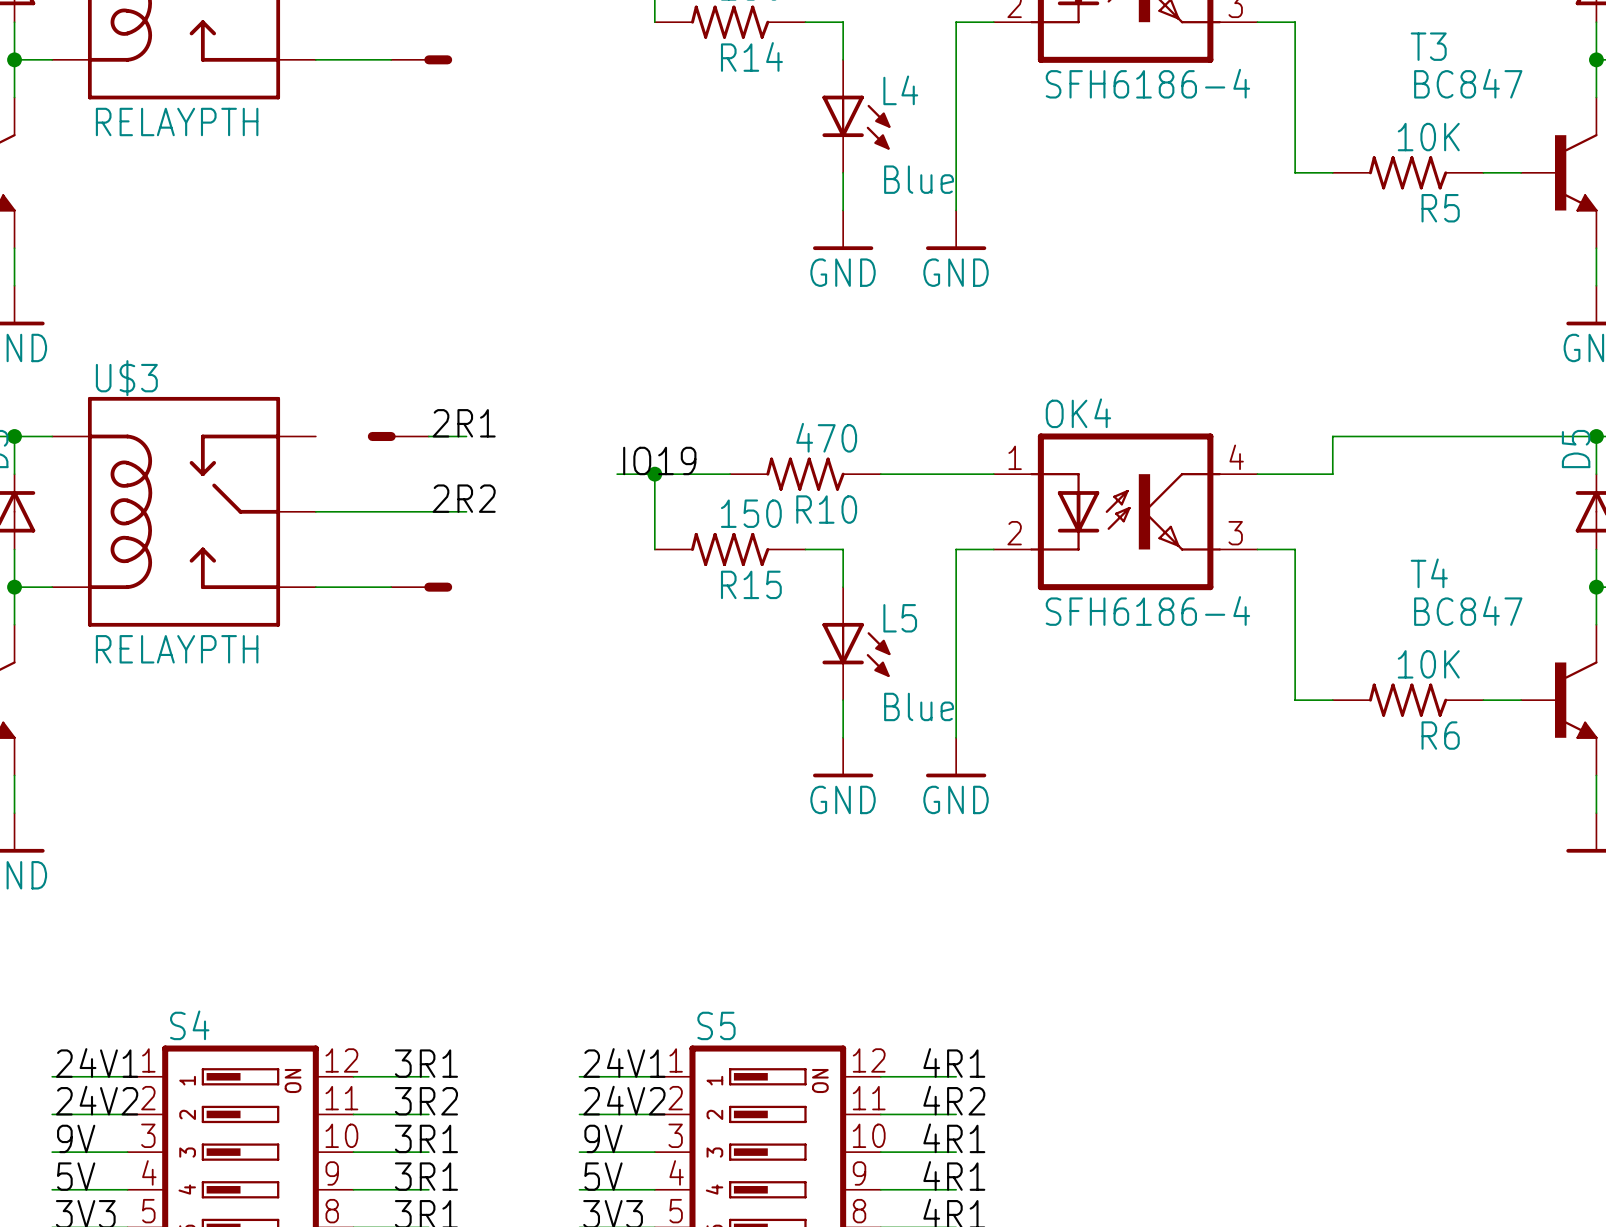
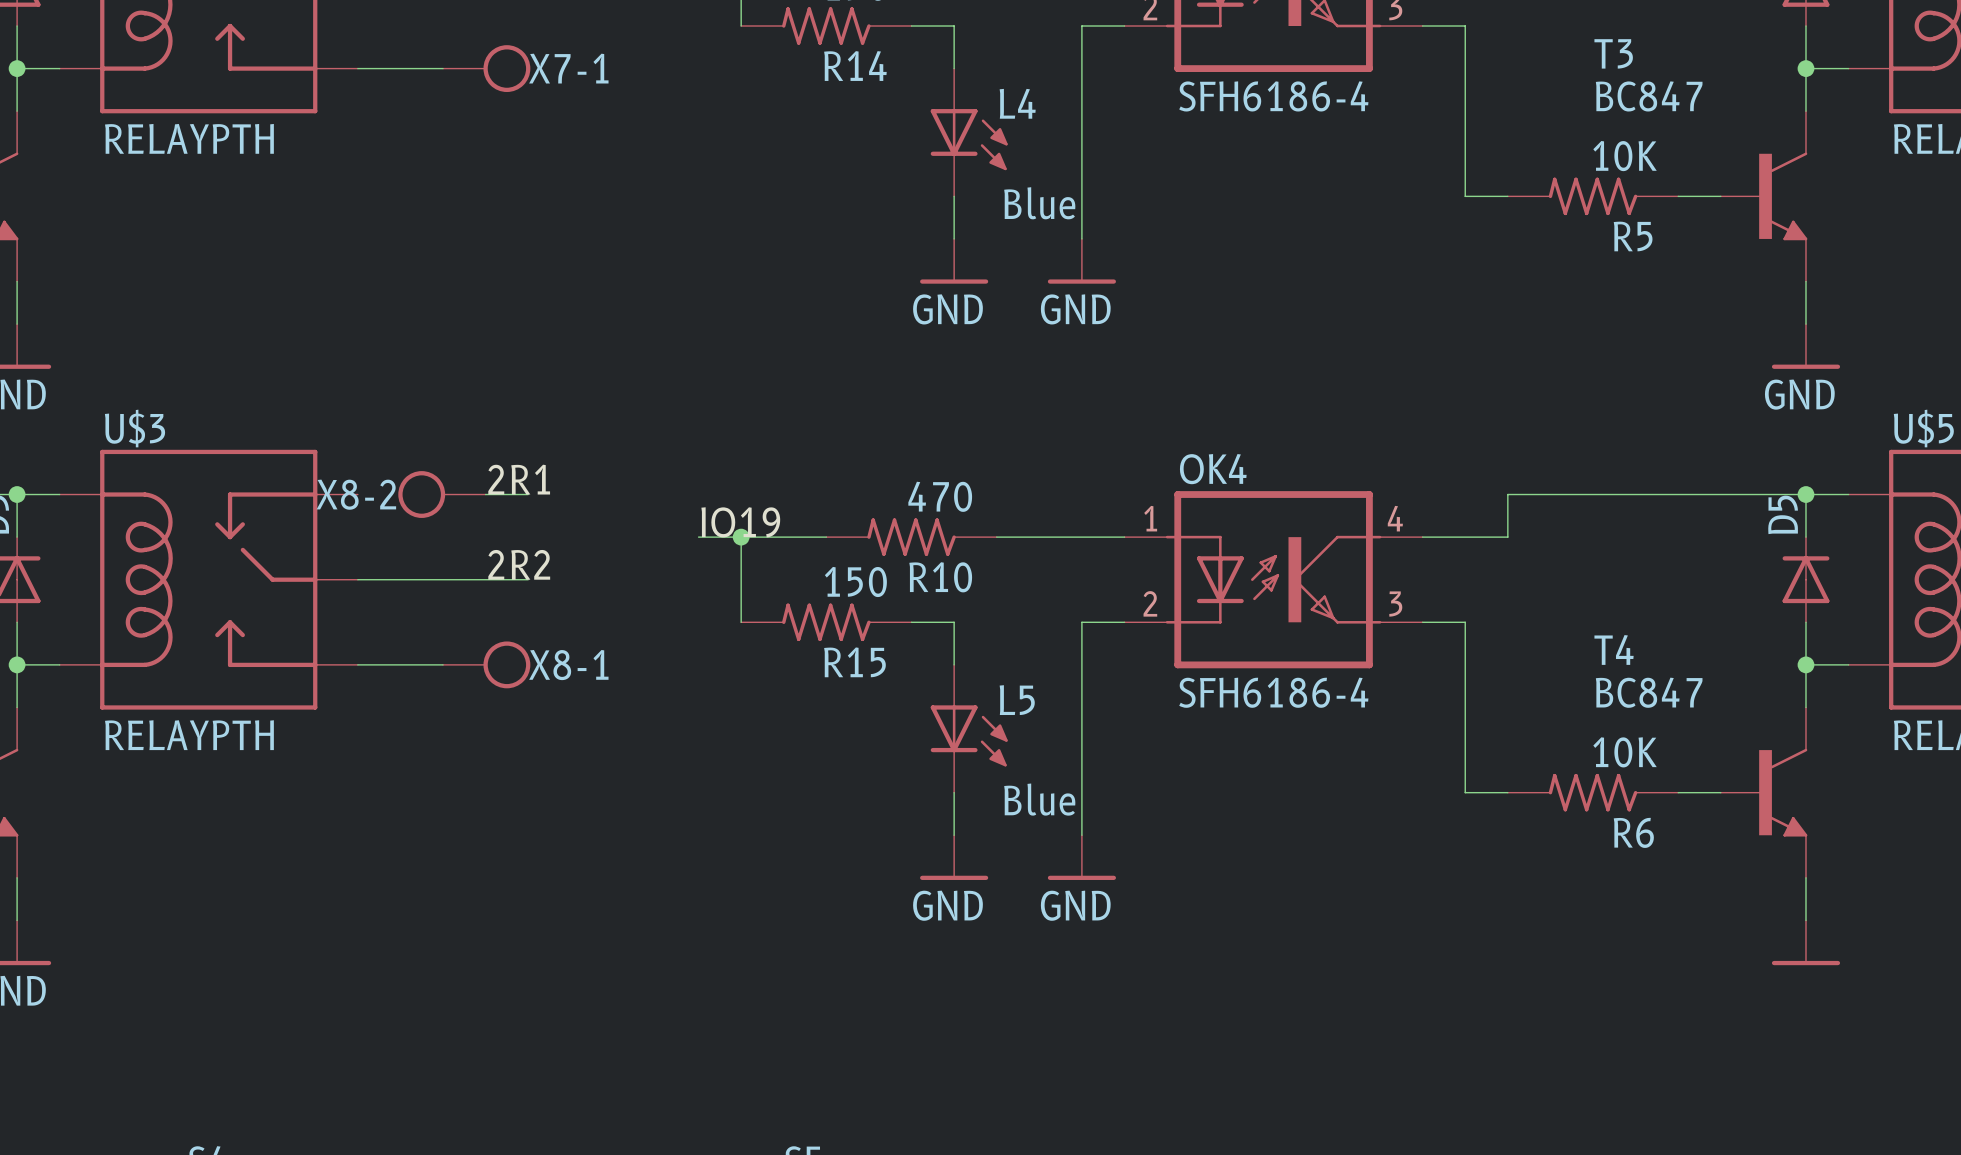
part: (421, 59) -> none
X7-1: none -> (486, 68)
X8-2: none -> (441, 494)
part: (398, 436) -> none
part: (421, 587) -> none
X8-1: none -> (486, 664)

